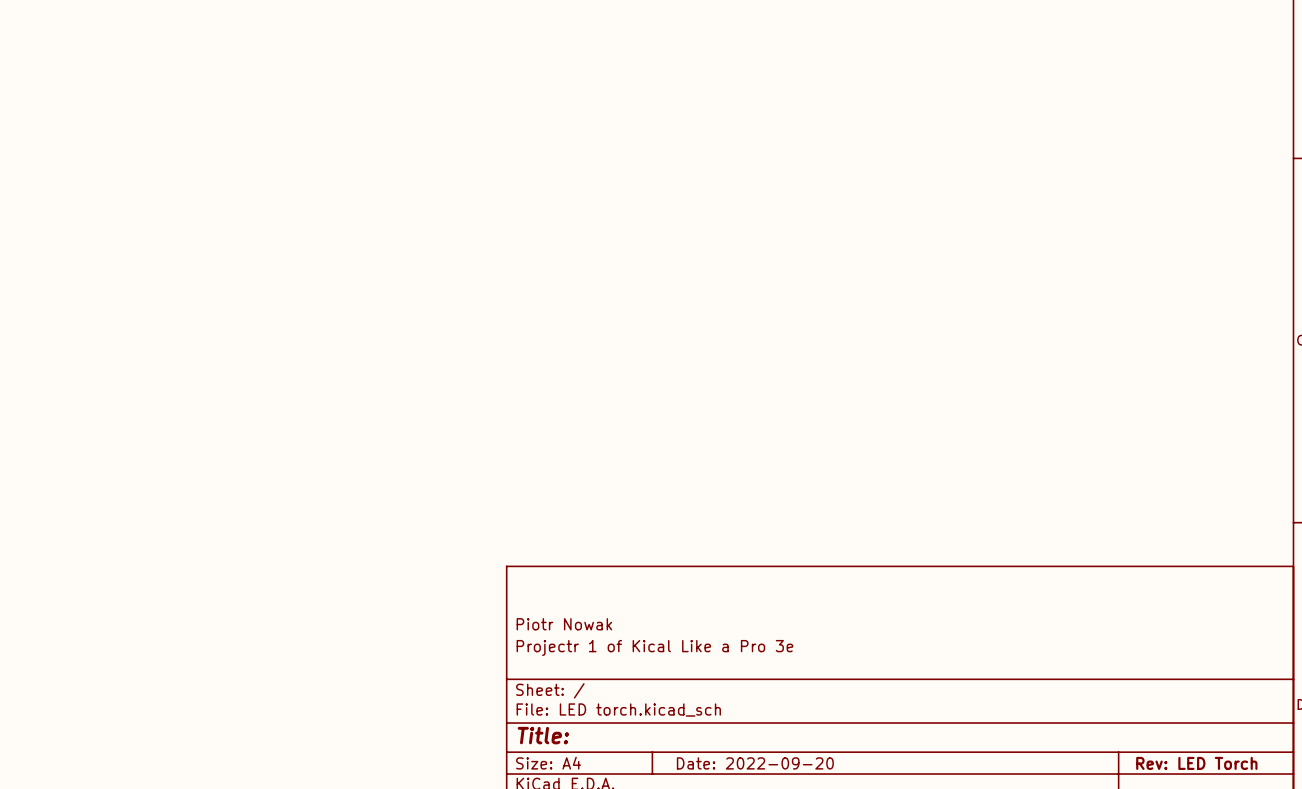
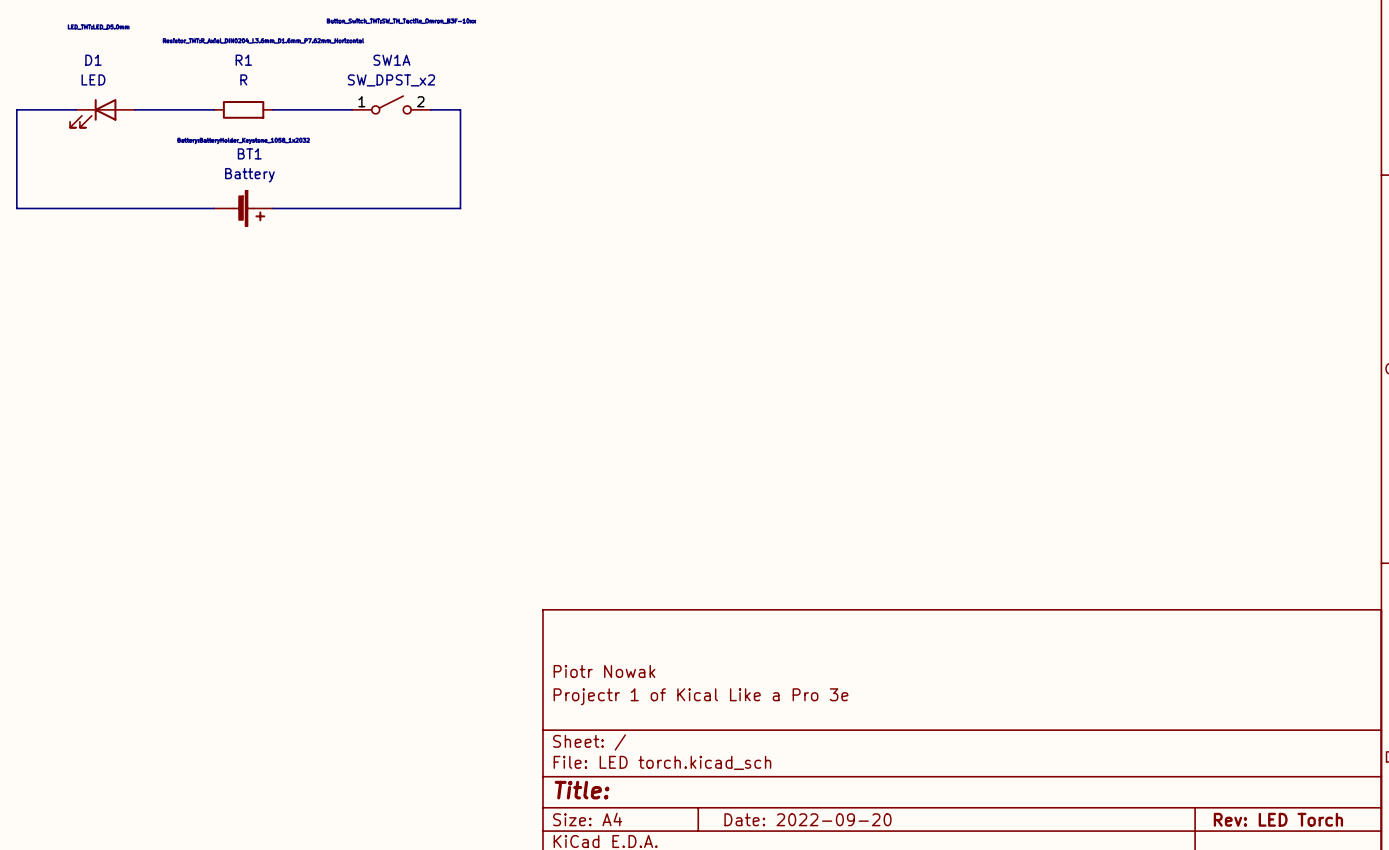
SW1A: none -> SW_DPST_x2 (391, 104)
wire: none -> (75, 109) (16, 109) (16, 208) (214, 208)
wire: none -> (135, 109) (214, 109)
R1: none -> R (243, 109)
wire: none -> (273, 109) (352, 109)
wire: none -> (430, 109) (460, 109) (460, 208) (273, 208)
D1: none -> LED (102, 113)
BT1: none -> Battery (243, 208)

